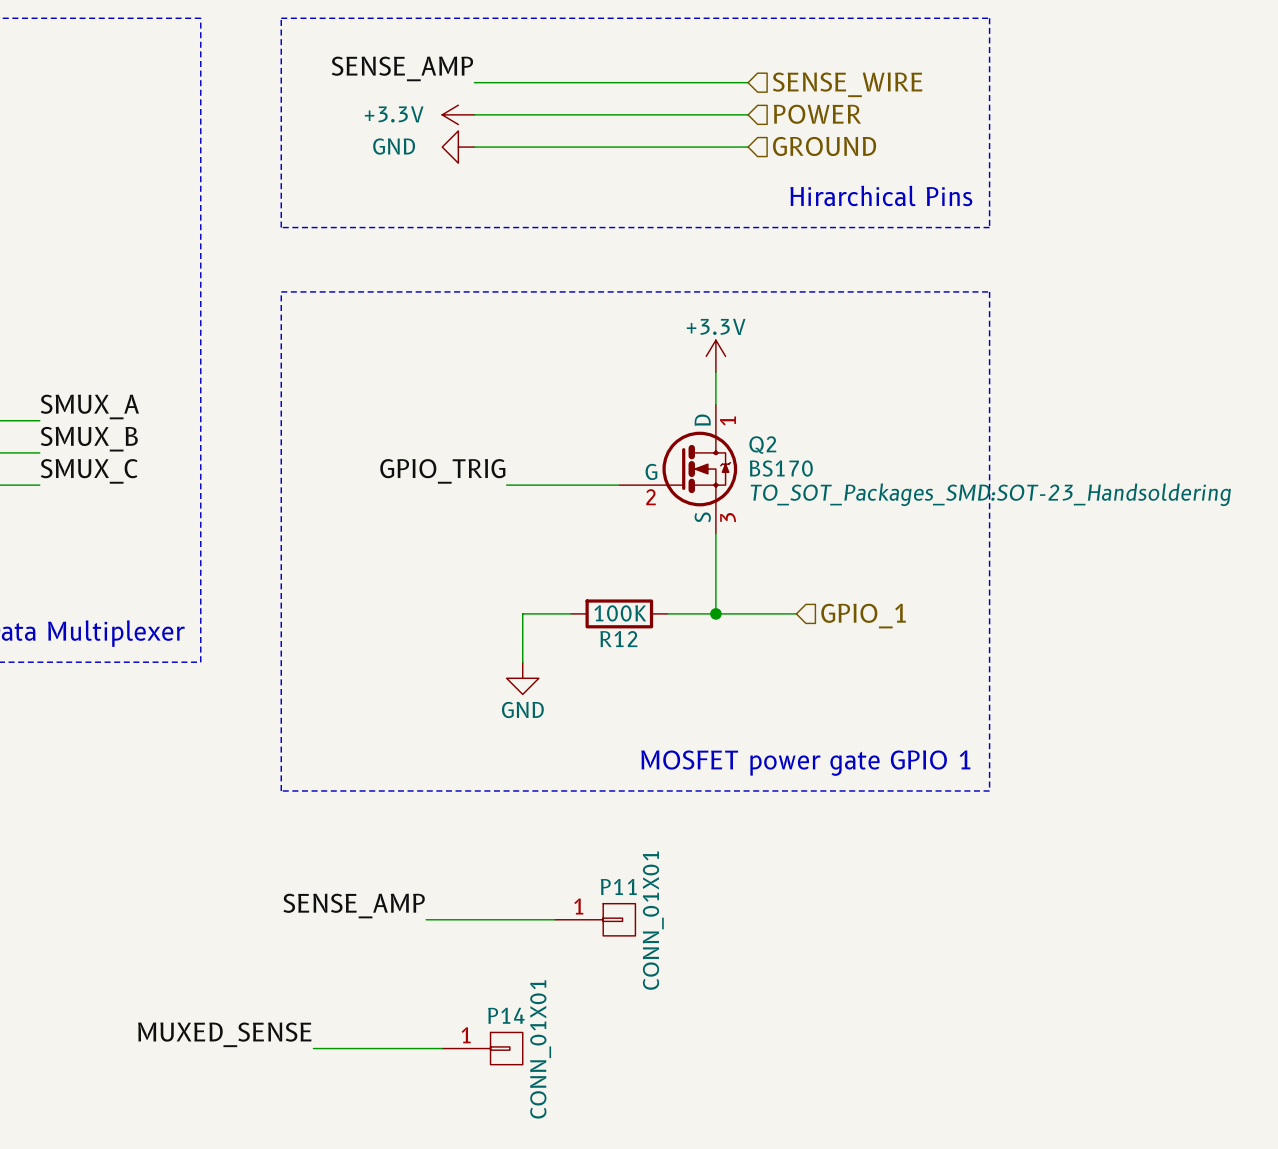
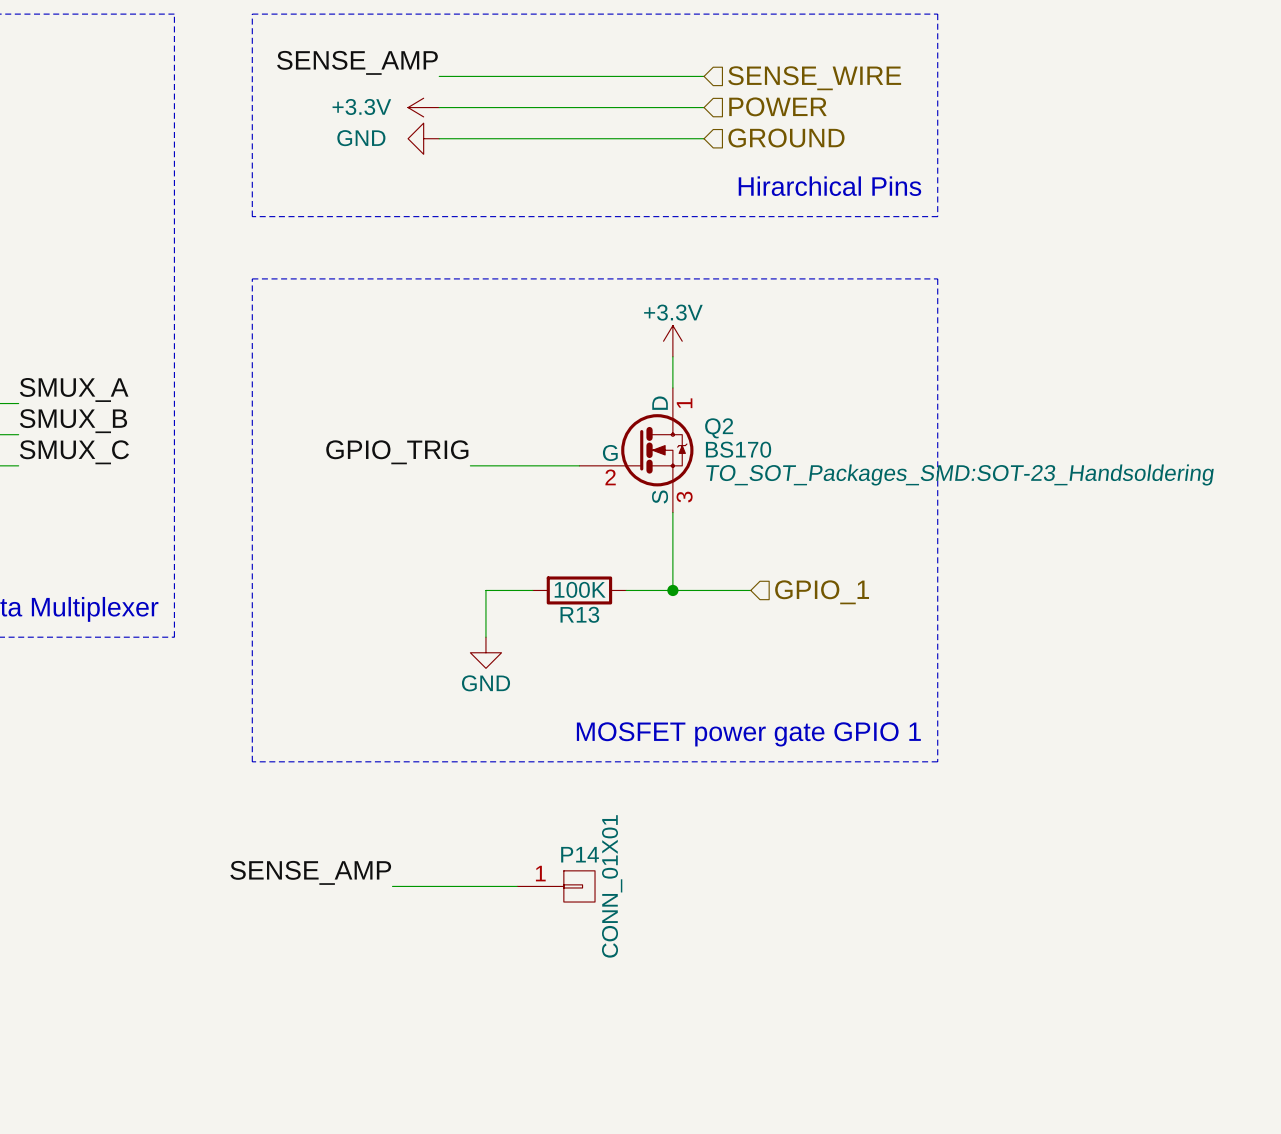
R12 name: R12 (618, 639) -> R13 (579, 614)
P11 name: P11 (618, 886) -> P14 (580, 854)
label: MUXED_SENSE (224, 1034) -> none
wire: (313, 1048) (442, 1048) -> none
P14: CONN_01X01 (482, 1048) -> none

